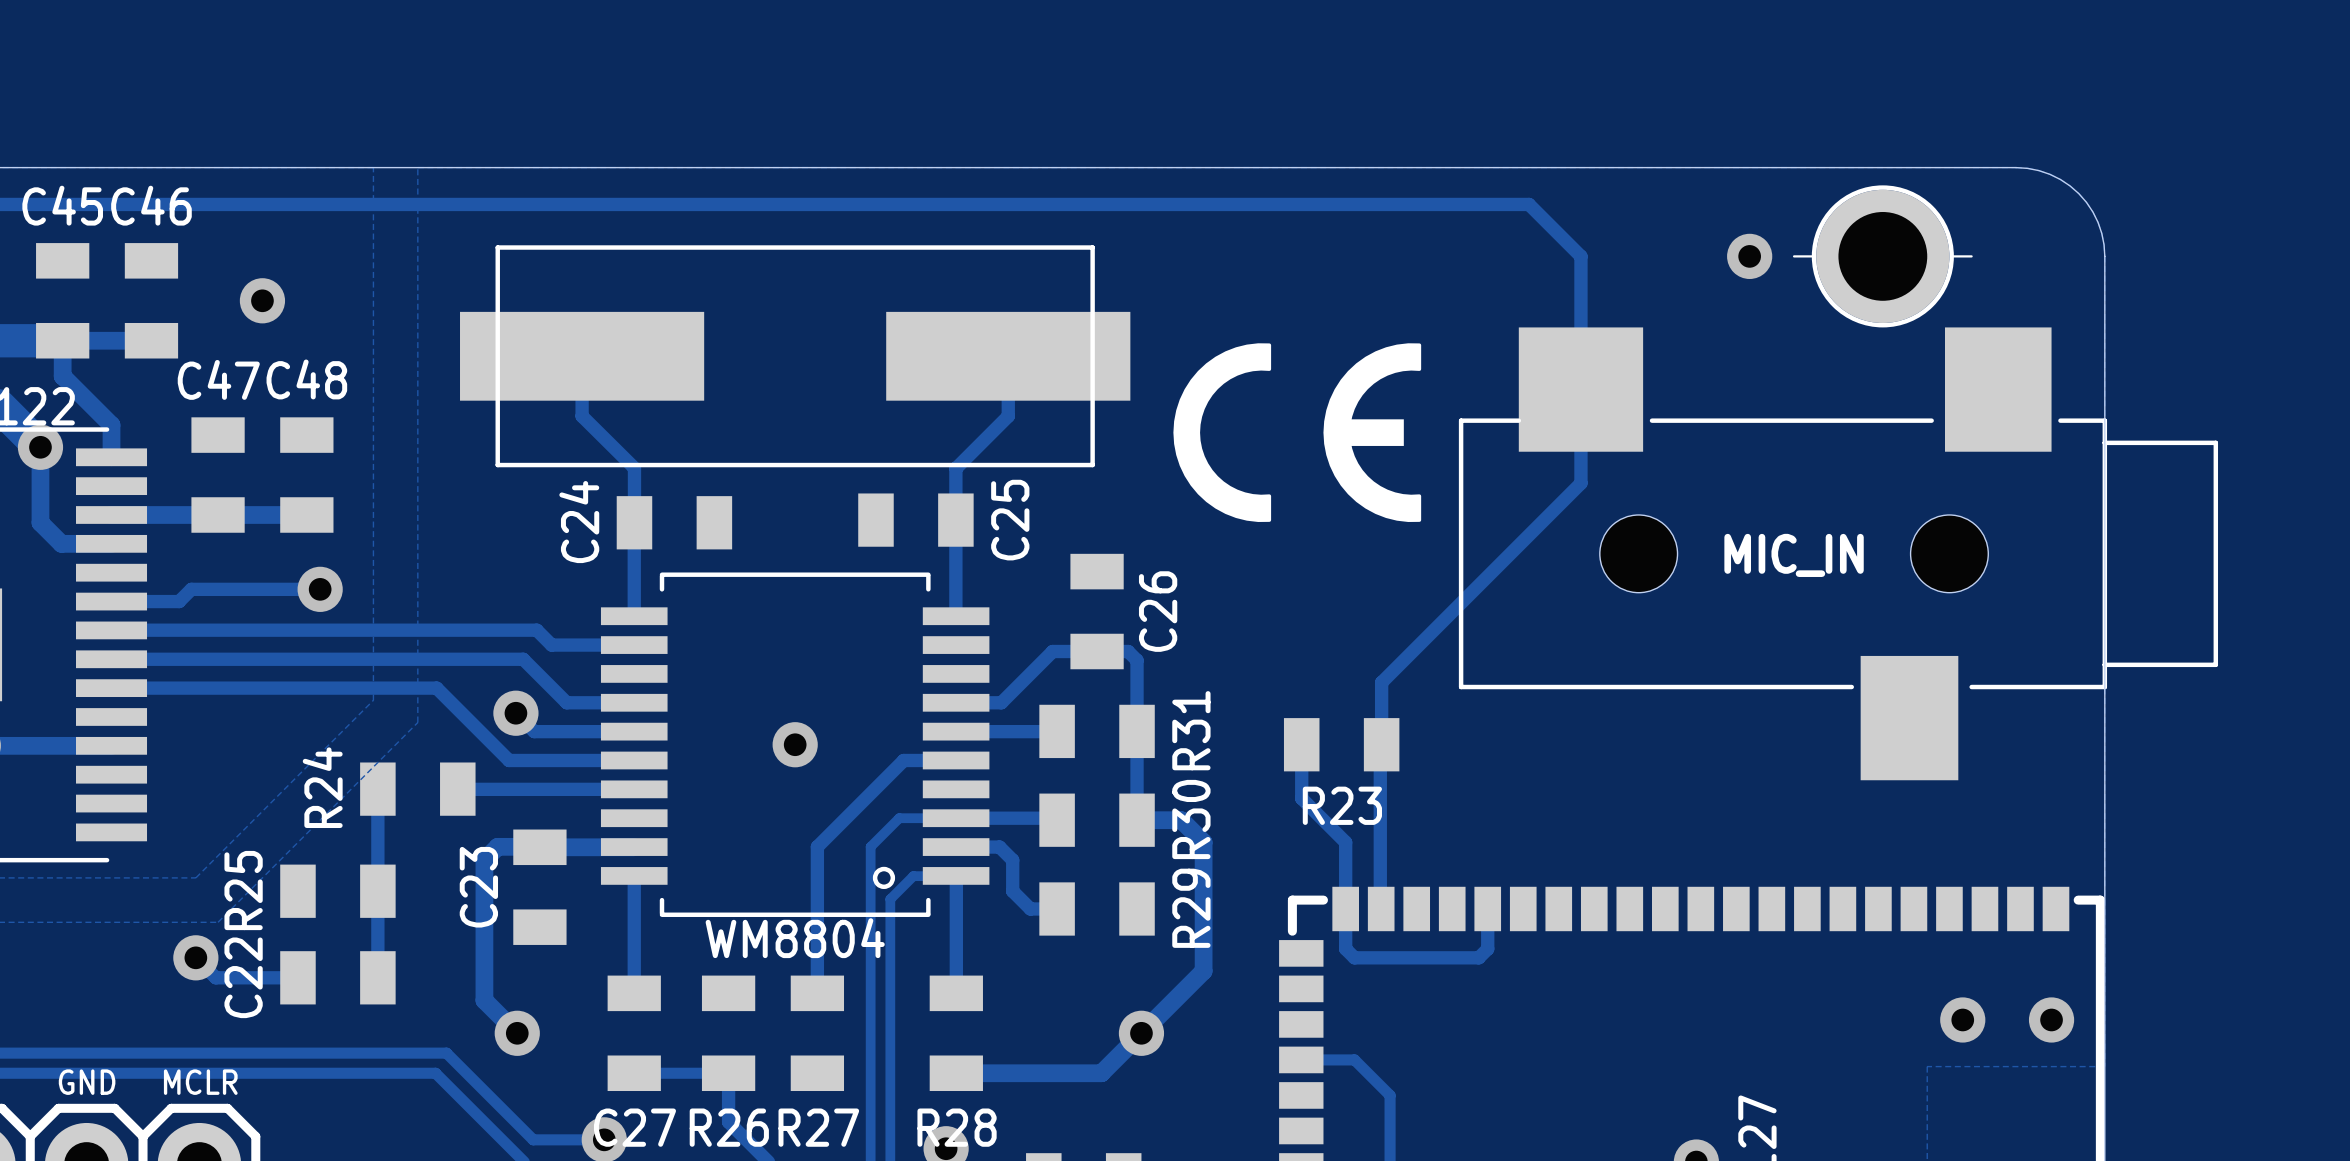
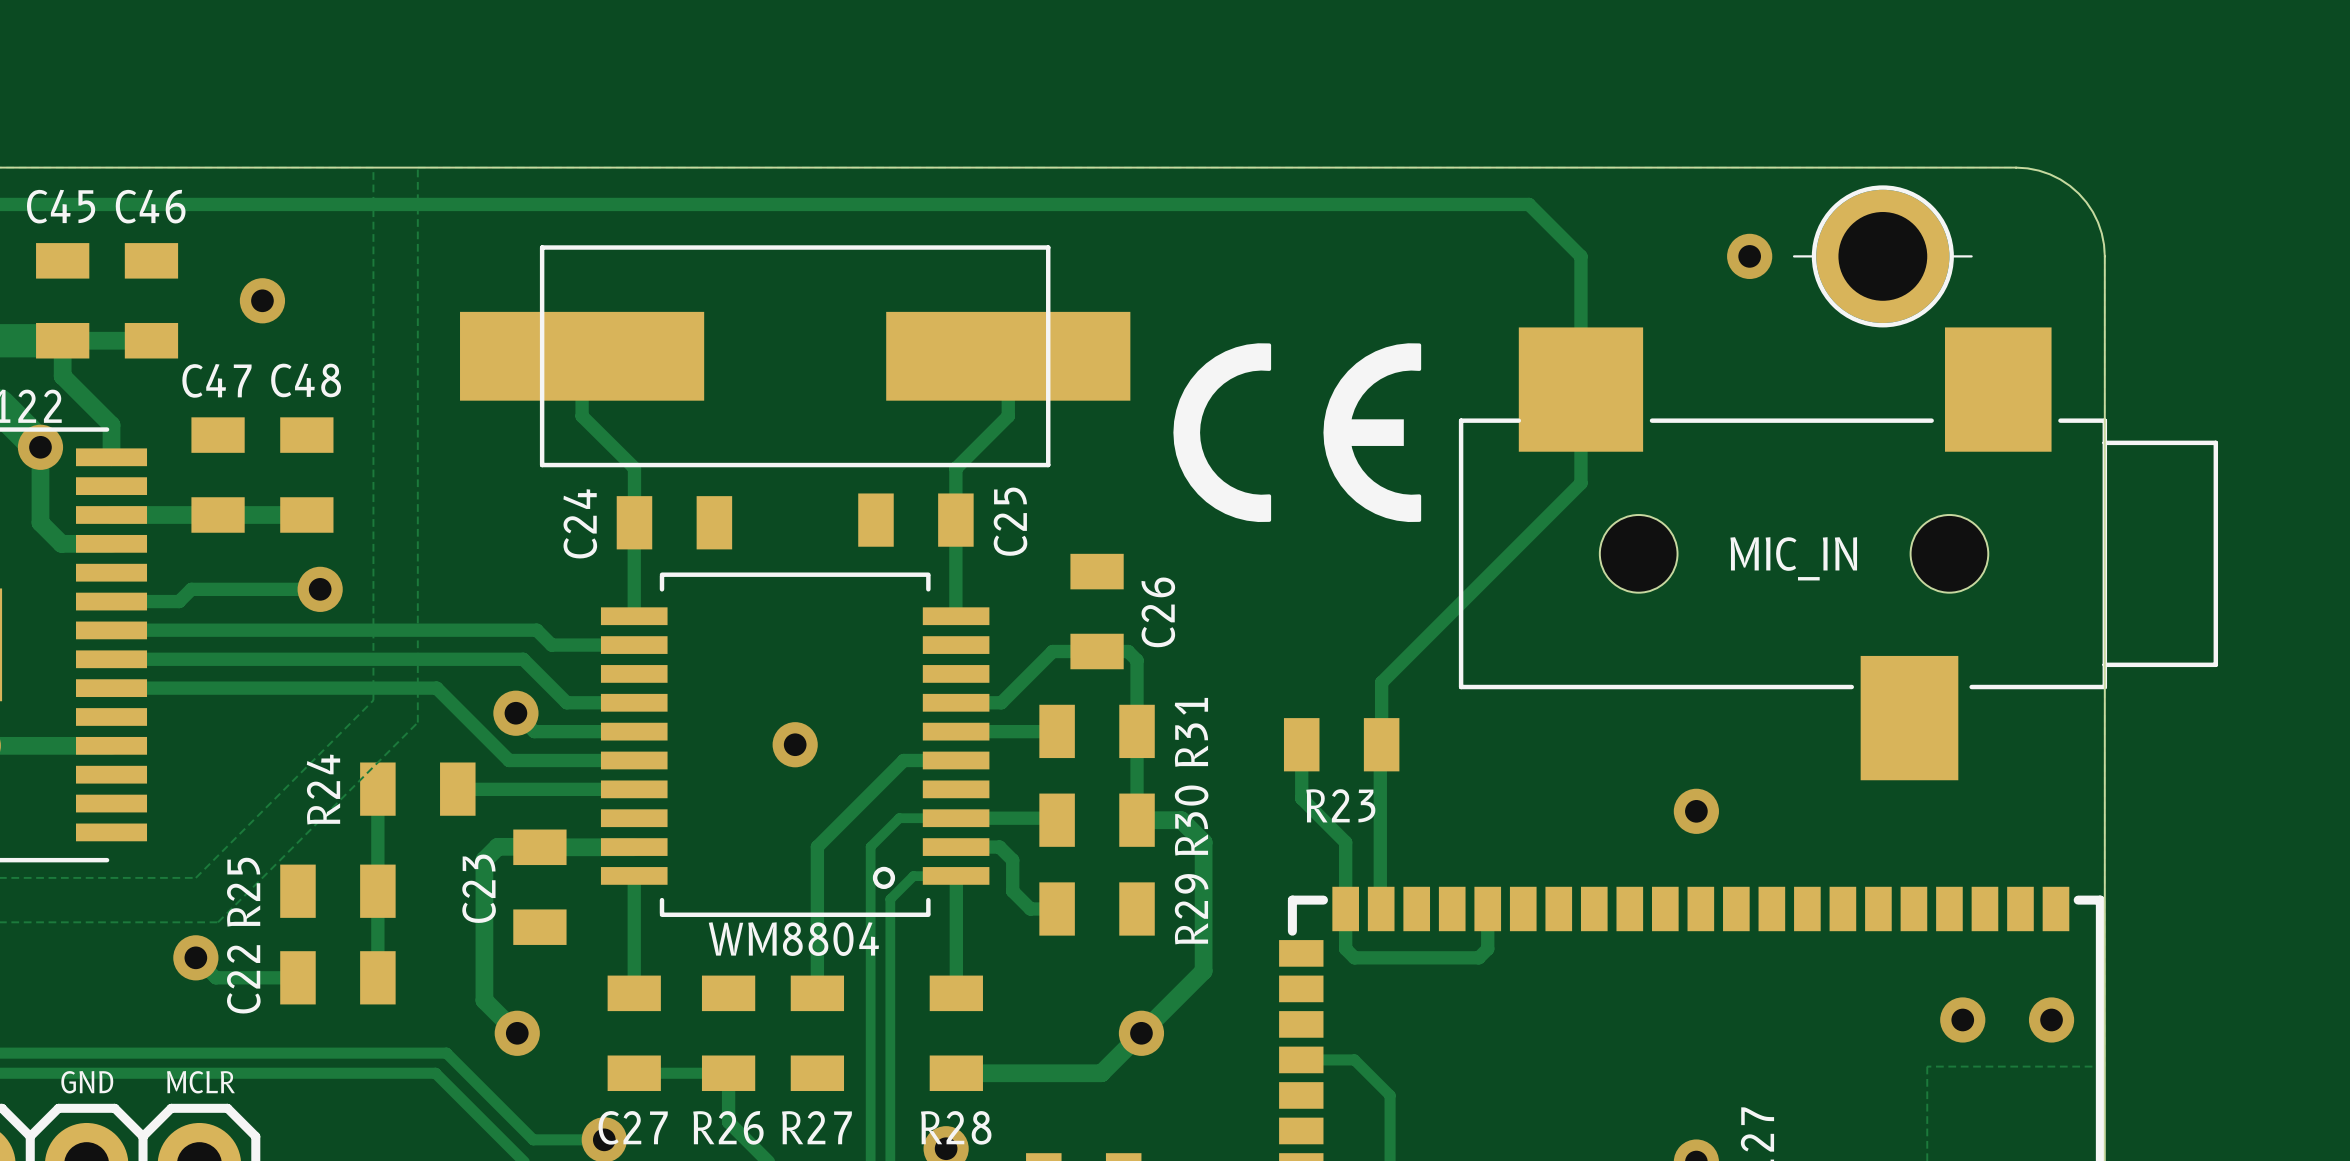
part footprint: [460, 245, 1131, 468] -> [460, 245, 1131, 468]
via: none -> (1696, 811)

